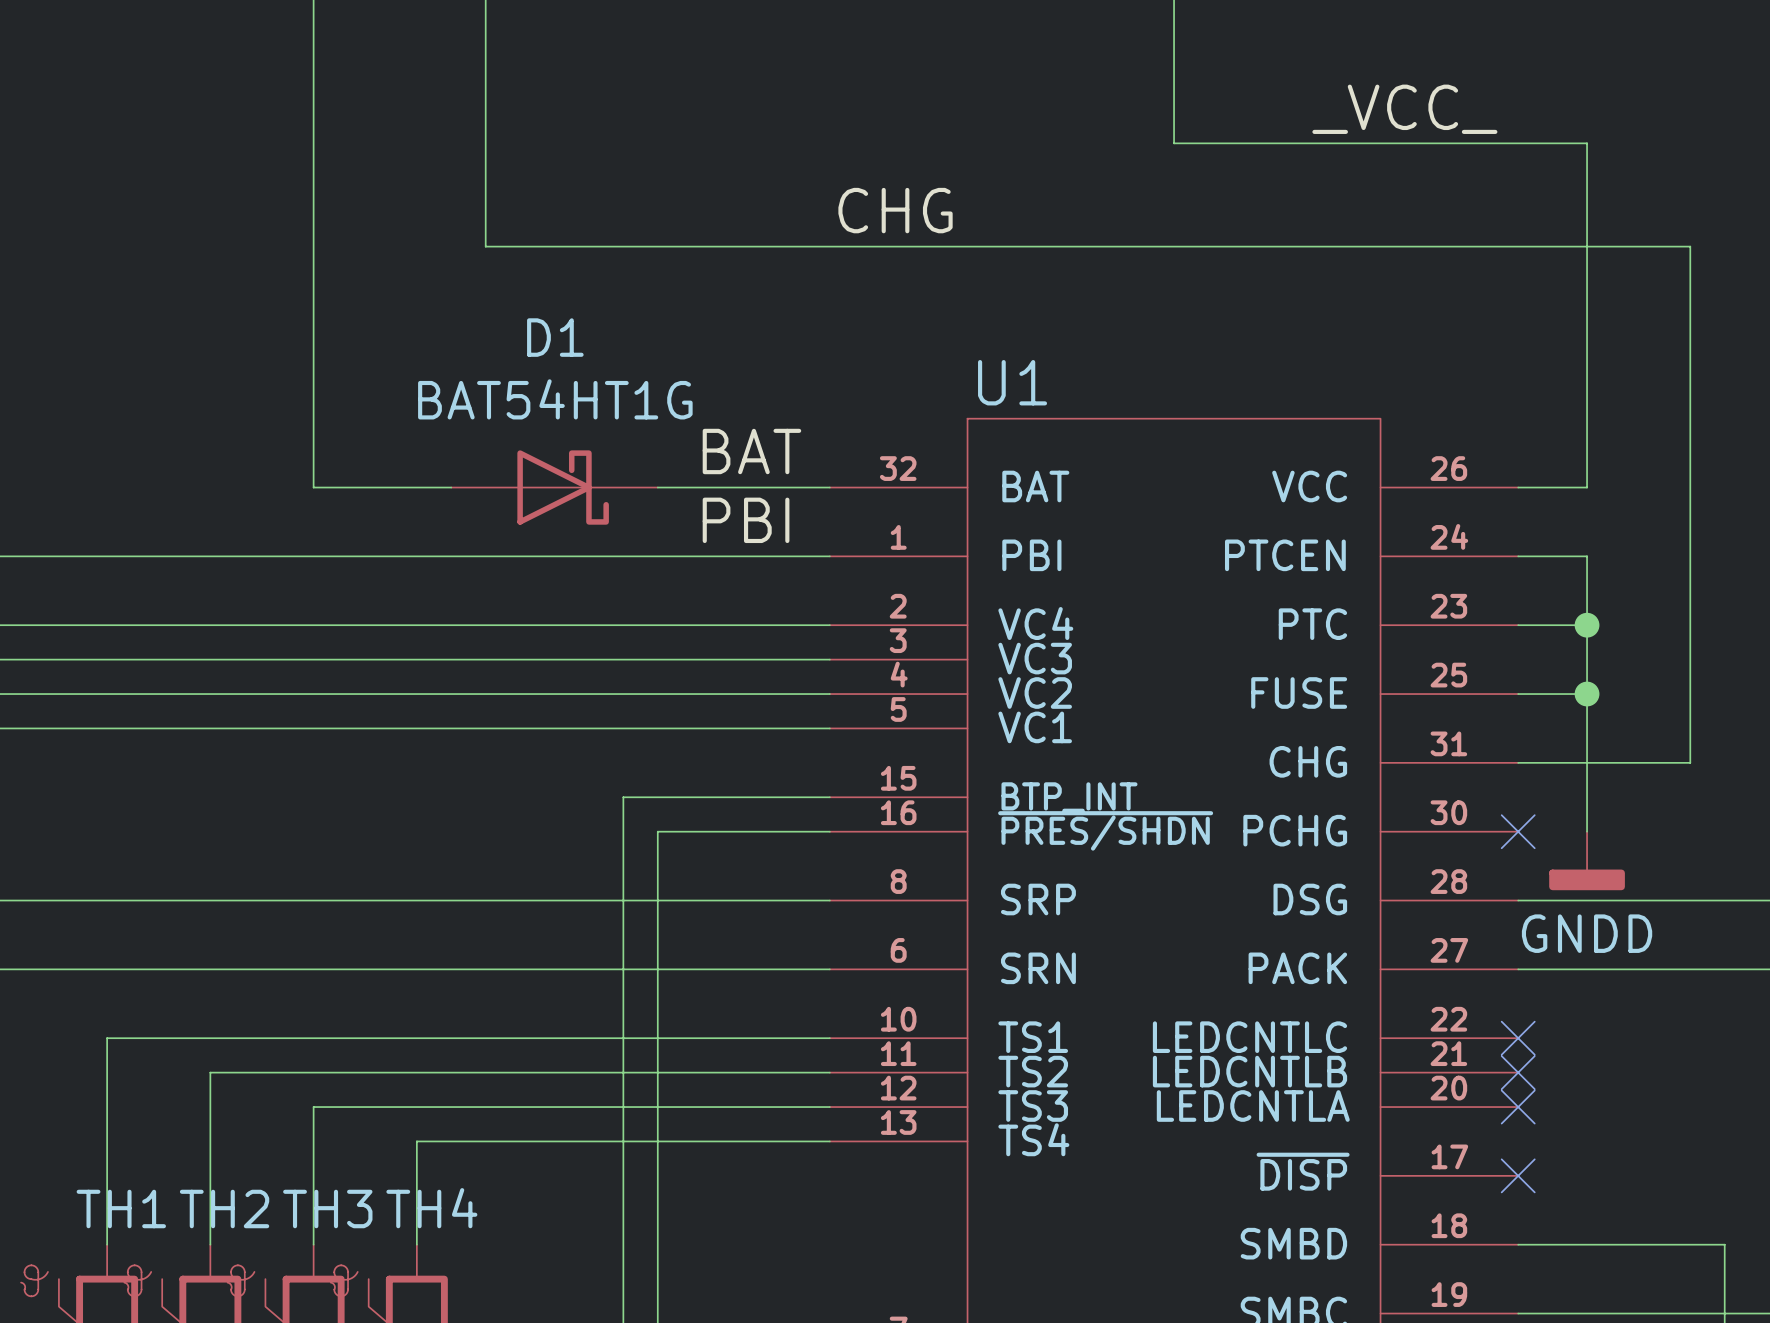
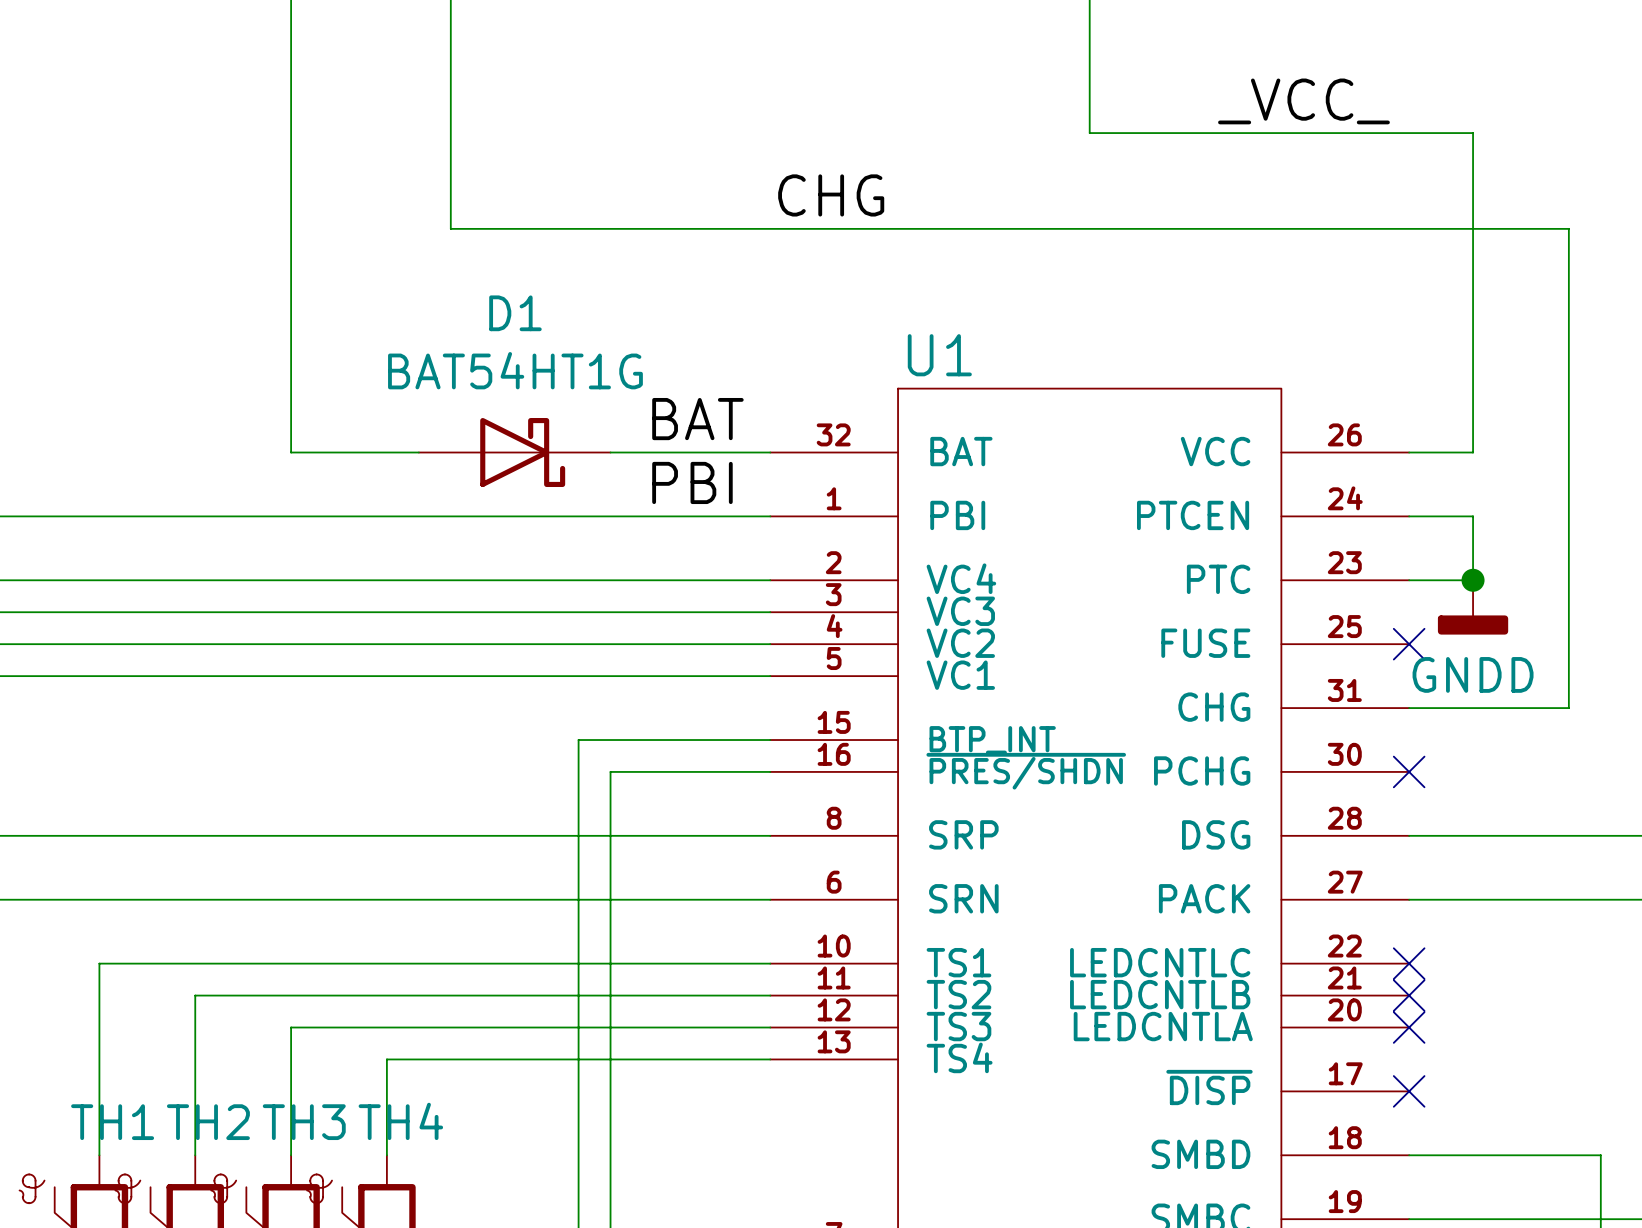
wire: (1587, 625) (1587, 831) -> none
wire: (1518, 694) (1587, 694) -> none
no-connect mark: none -> (1409, 644)
junction: (1587, 694) -> none
power symbol position: GNDD (1587, 860) -> GNDD (1473, 607)

